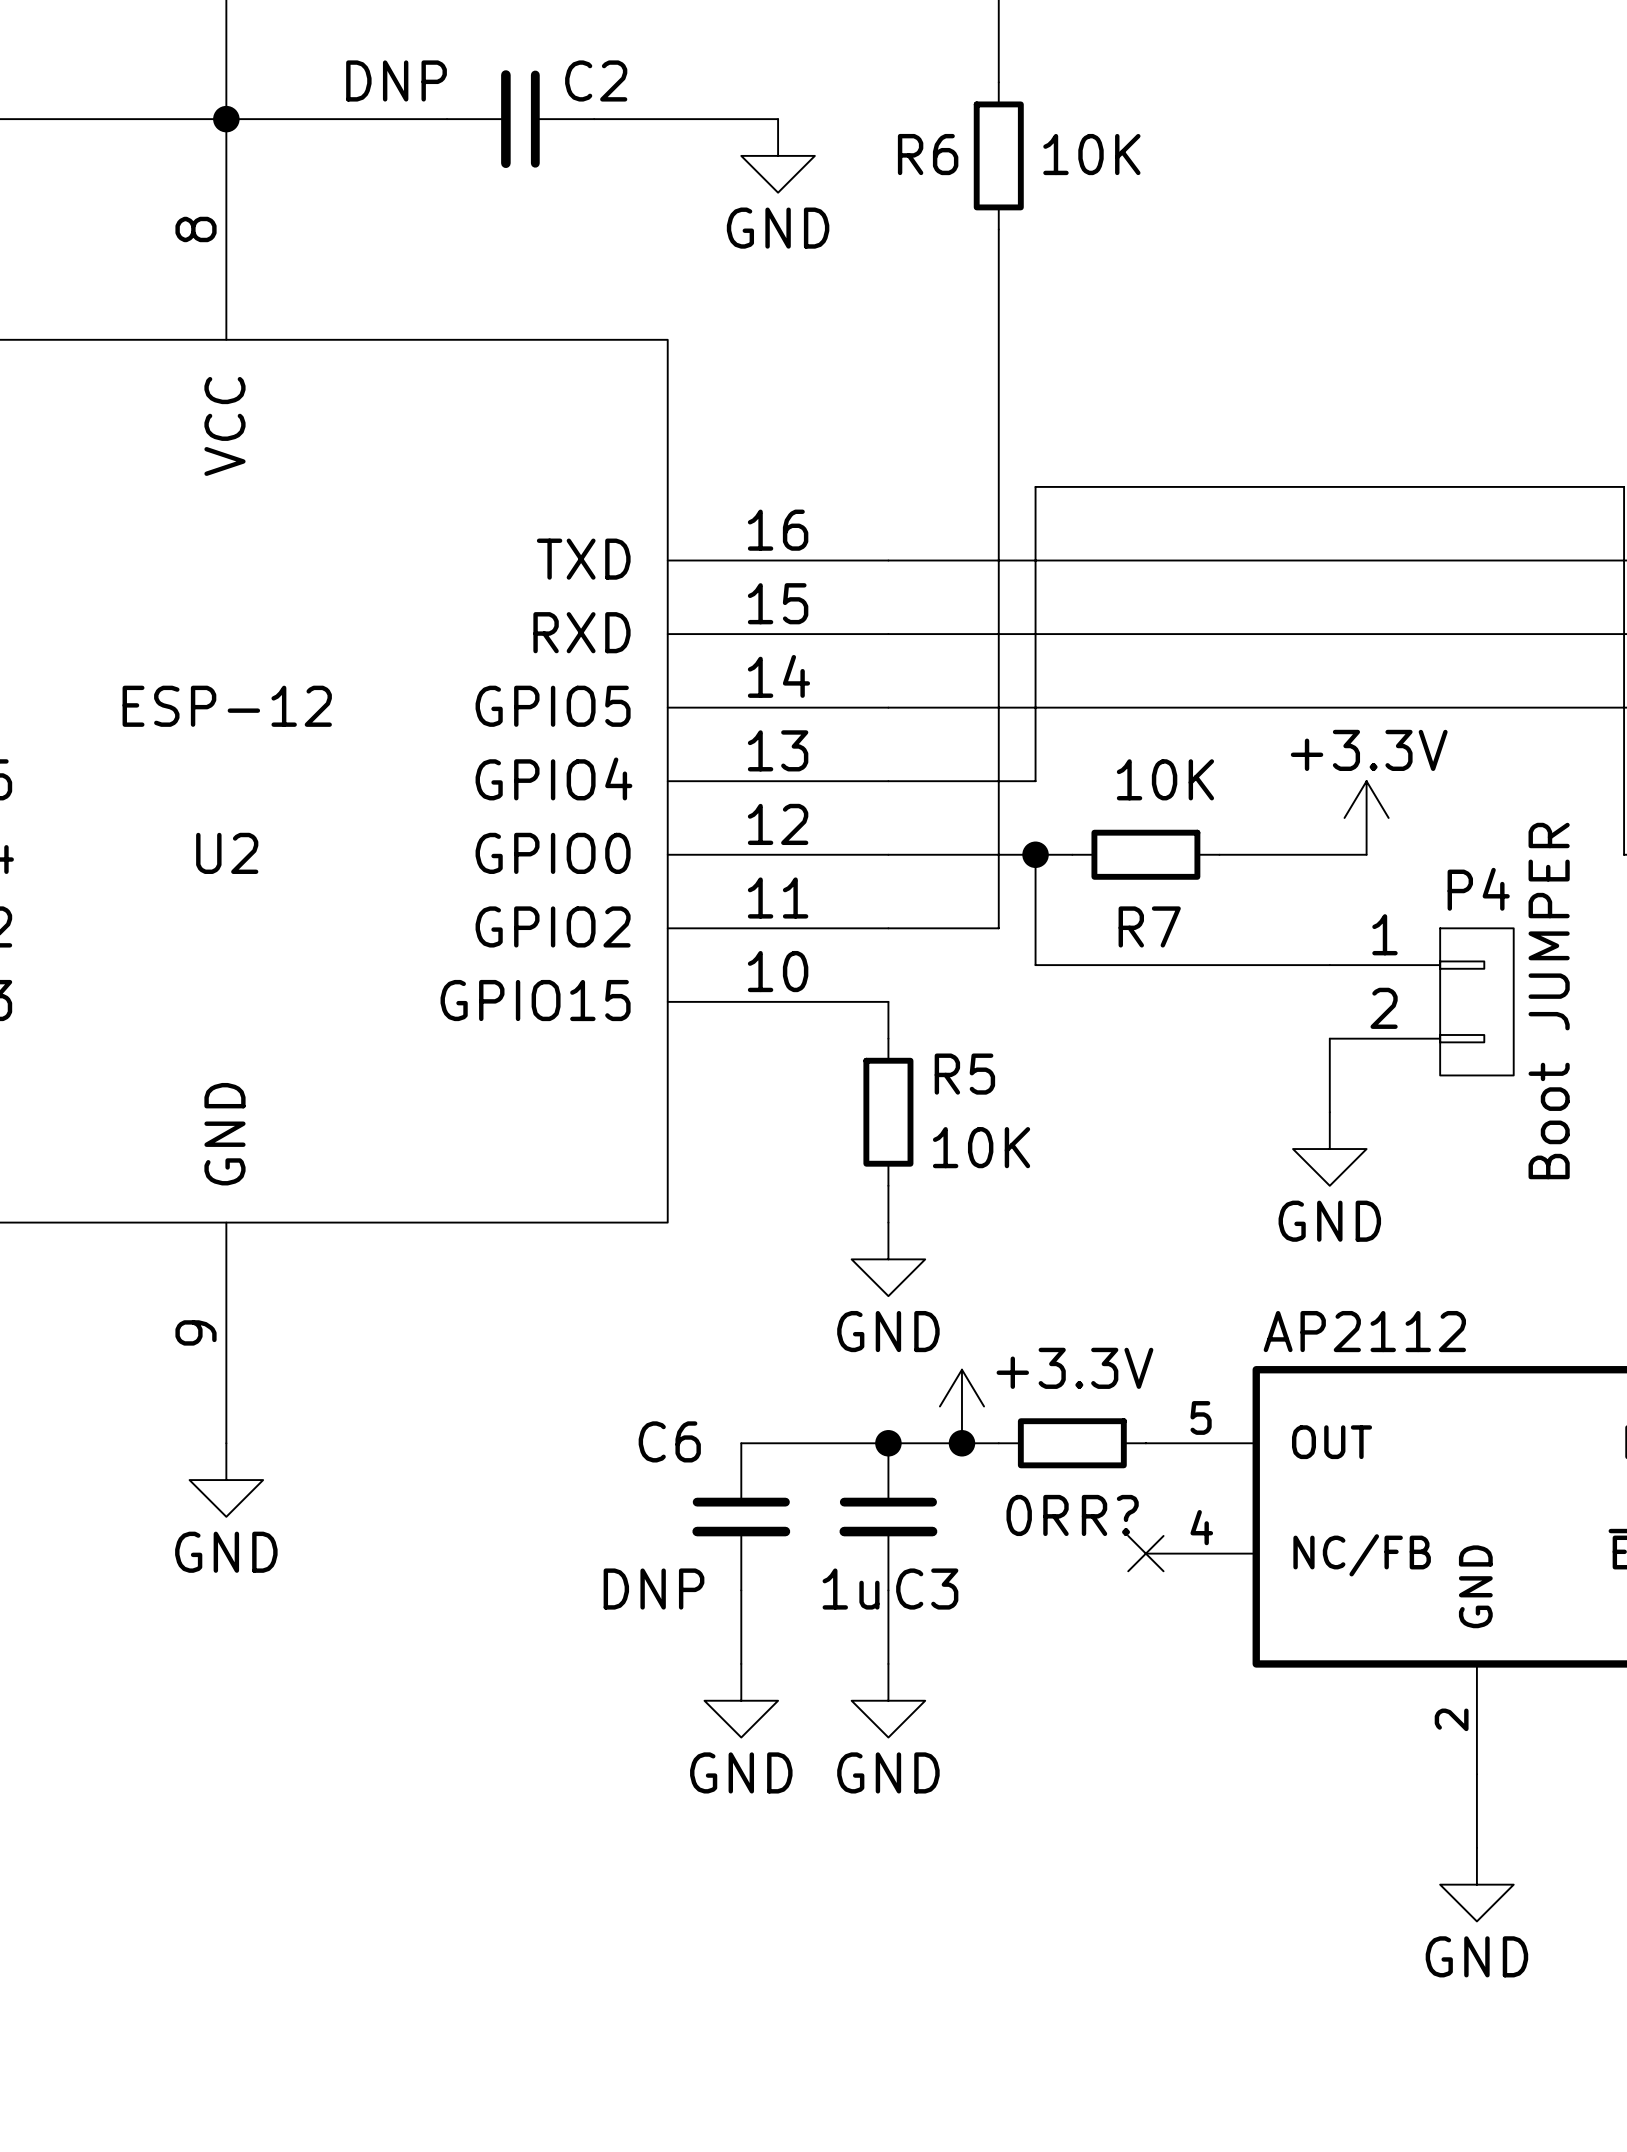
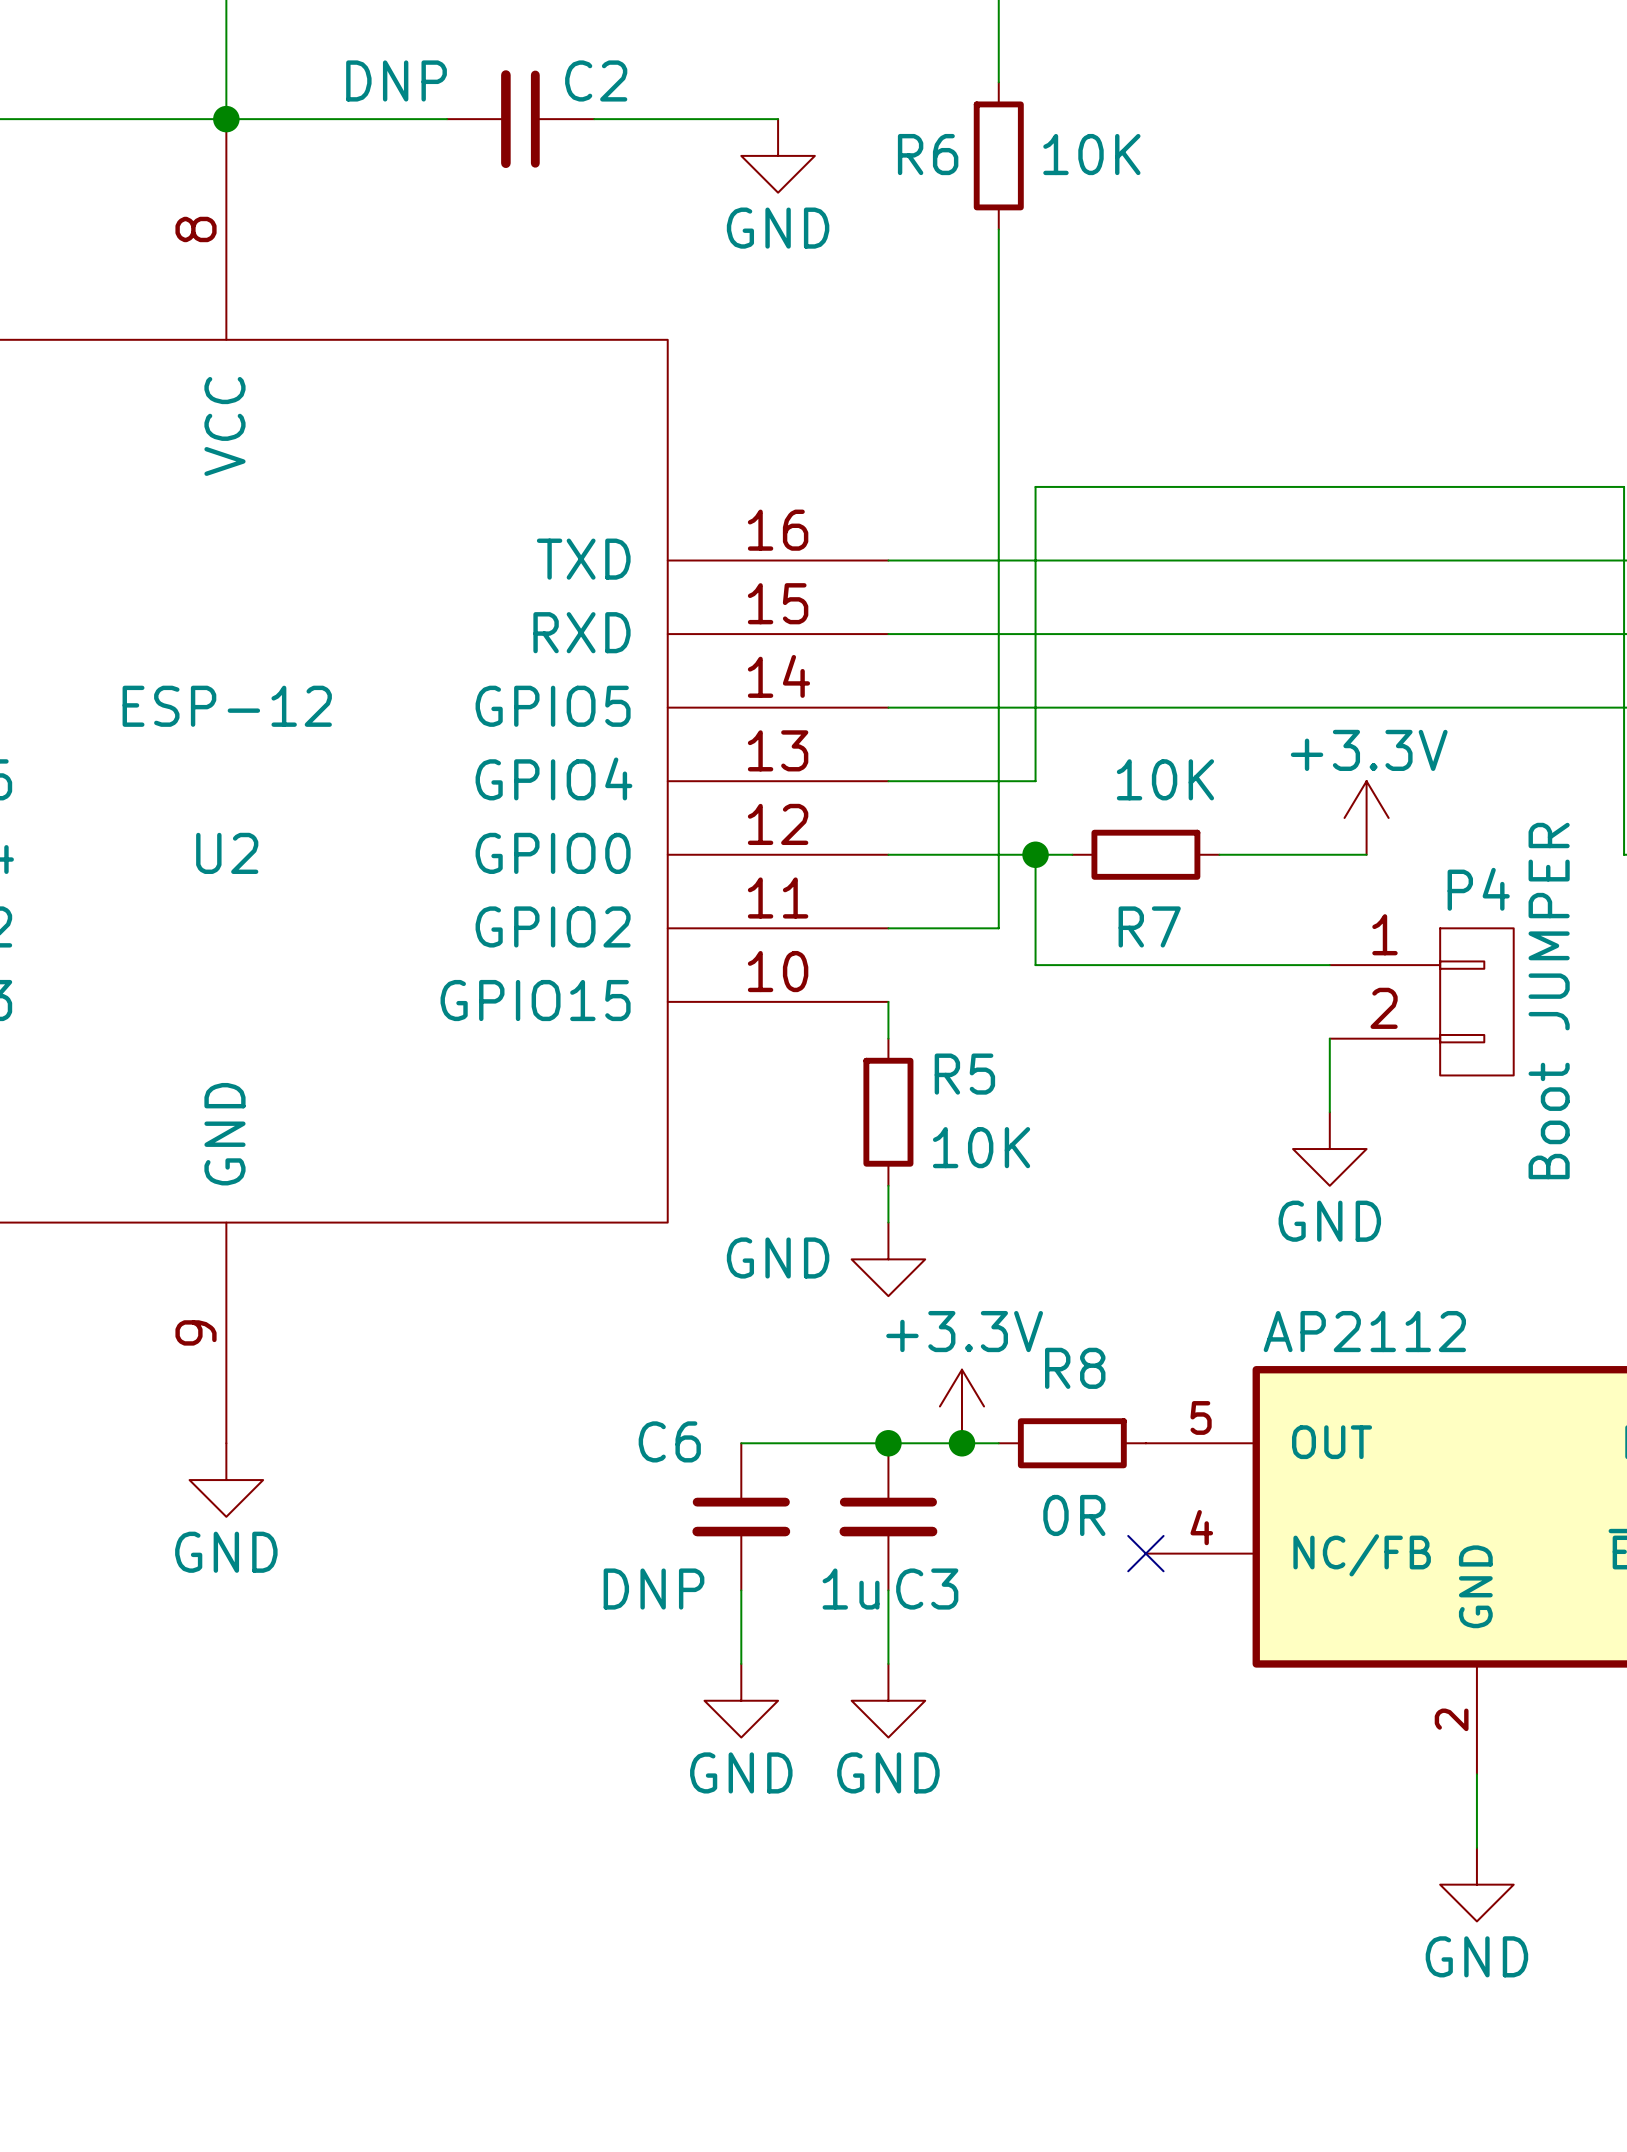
power symbol text position: GND (888, 1331) -> GND (778, 1257)
power symbol text position: +3.3V (1074, 1368) -> +3.3V (964, 1331)
R? value position: 0R (1037, 1515) -> 0R (1074, 1515)
R? name: R? (1110, 1515) -> R8 (1075, 1368)

